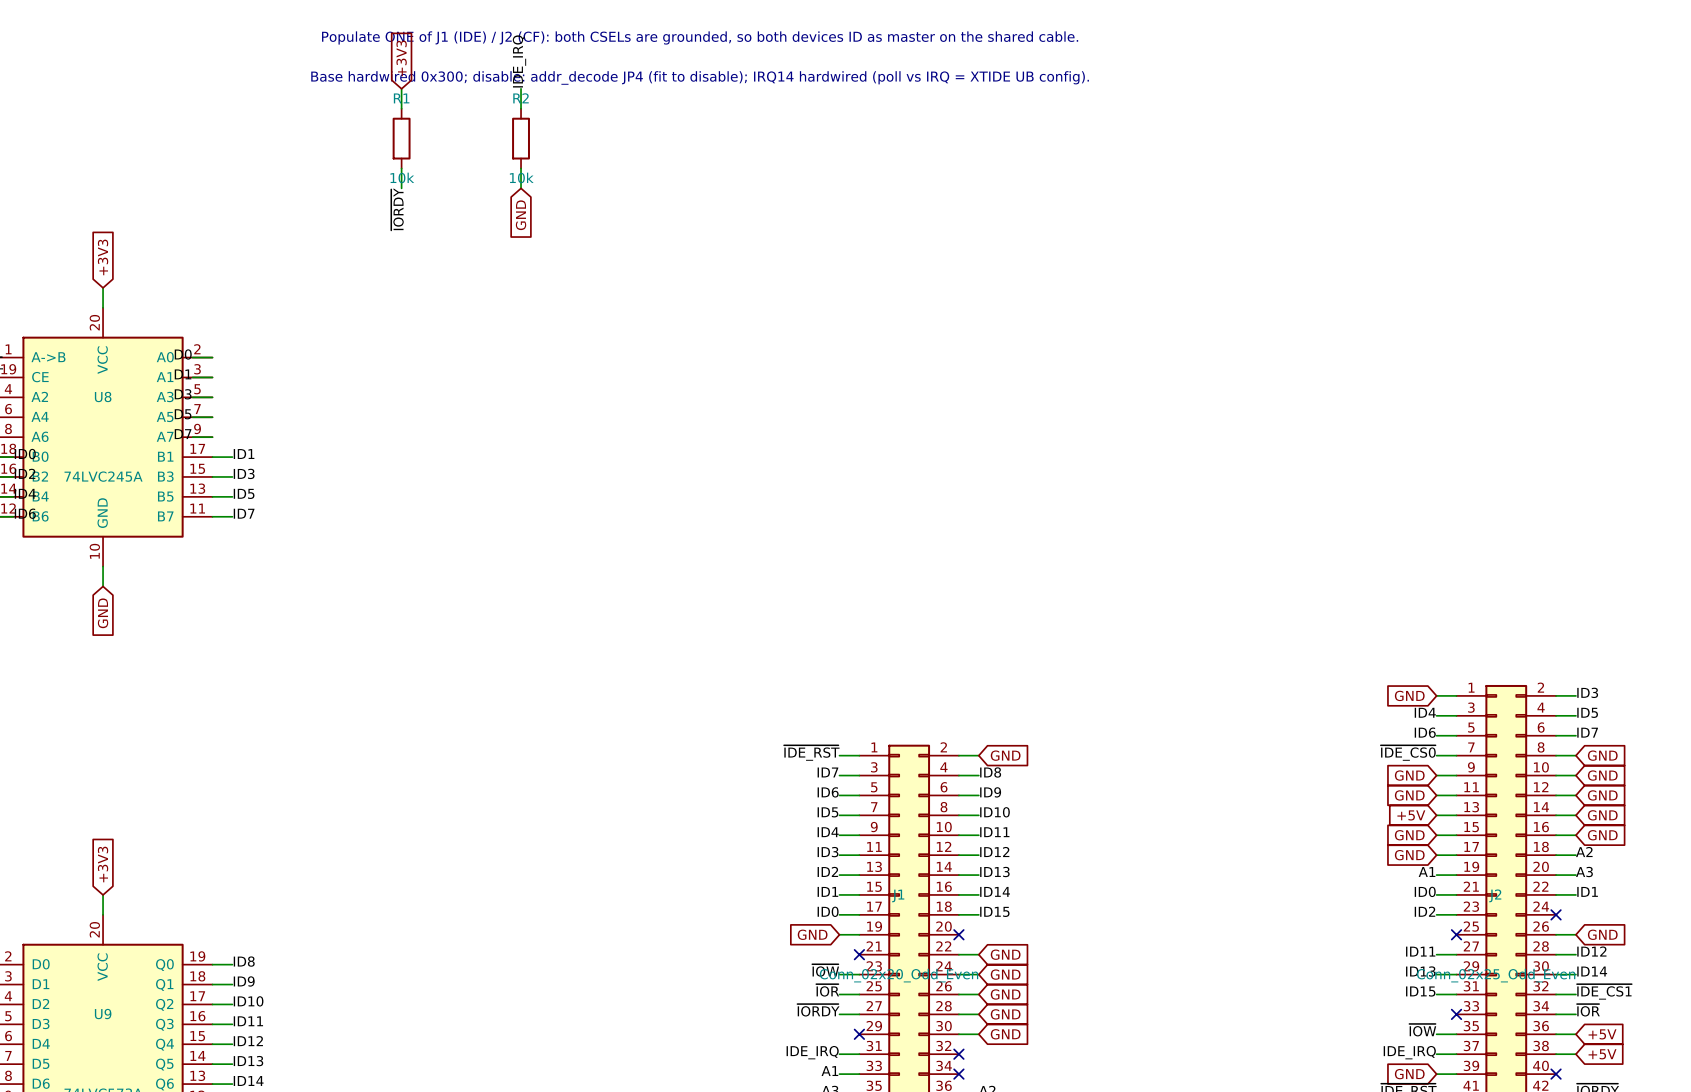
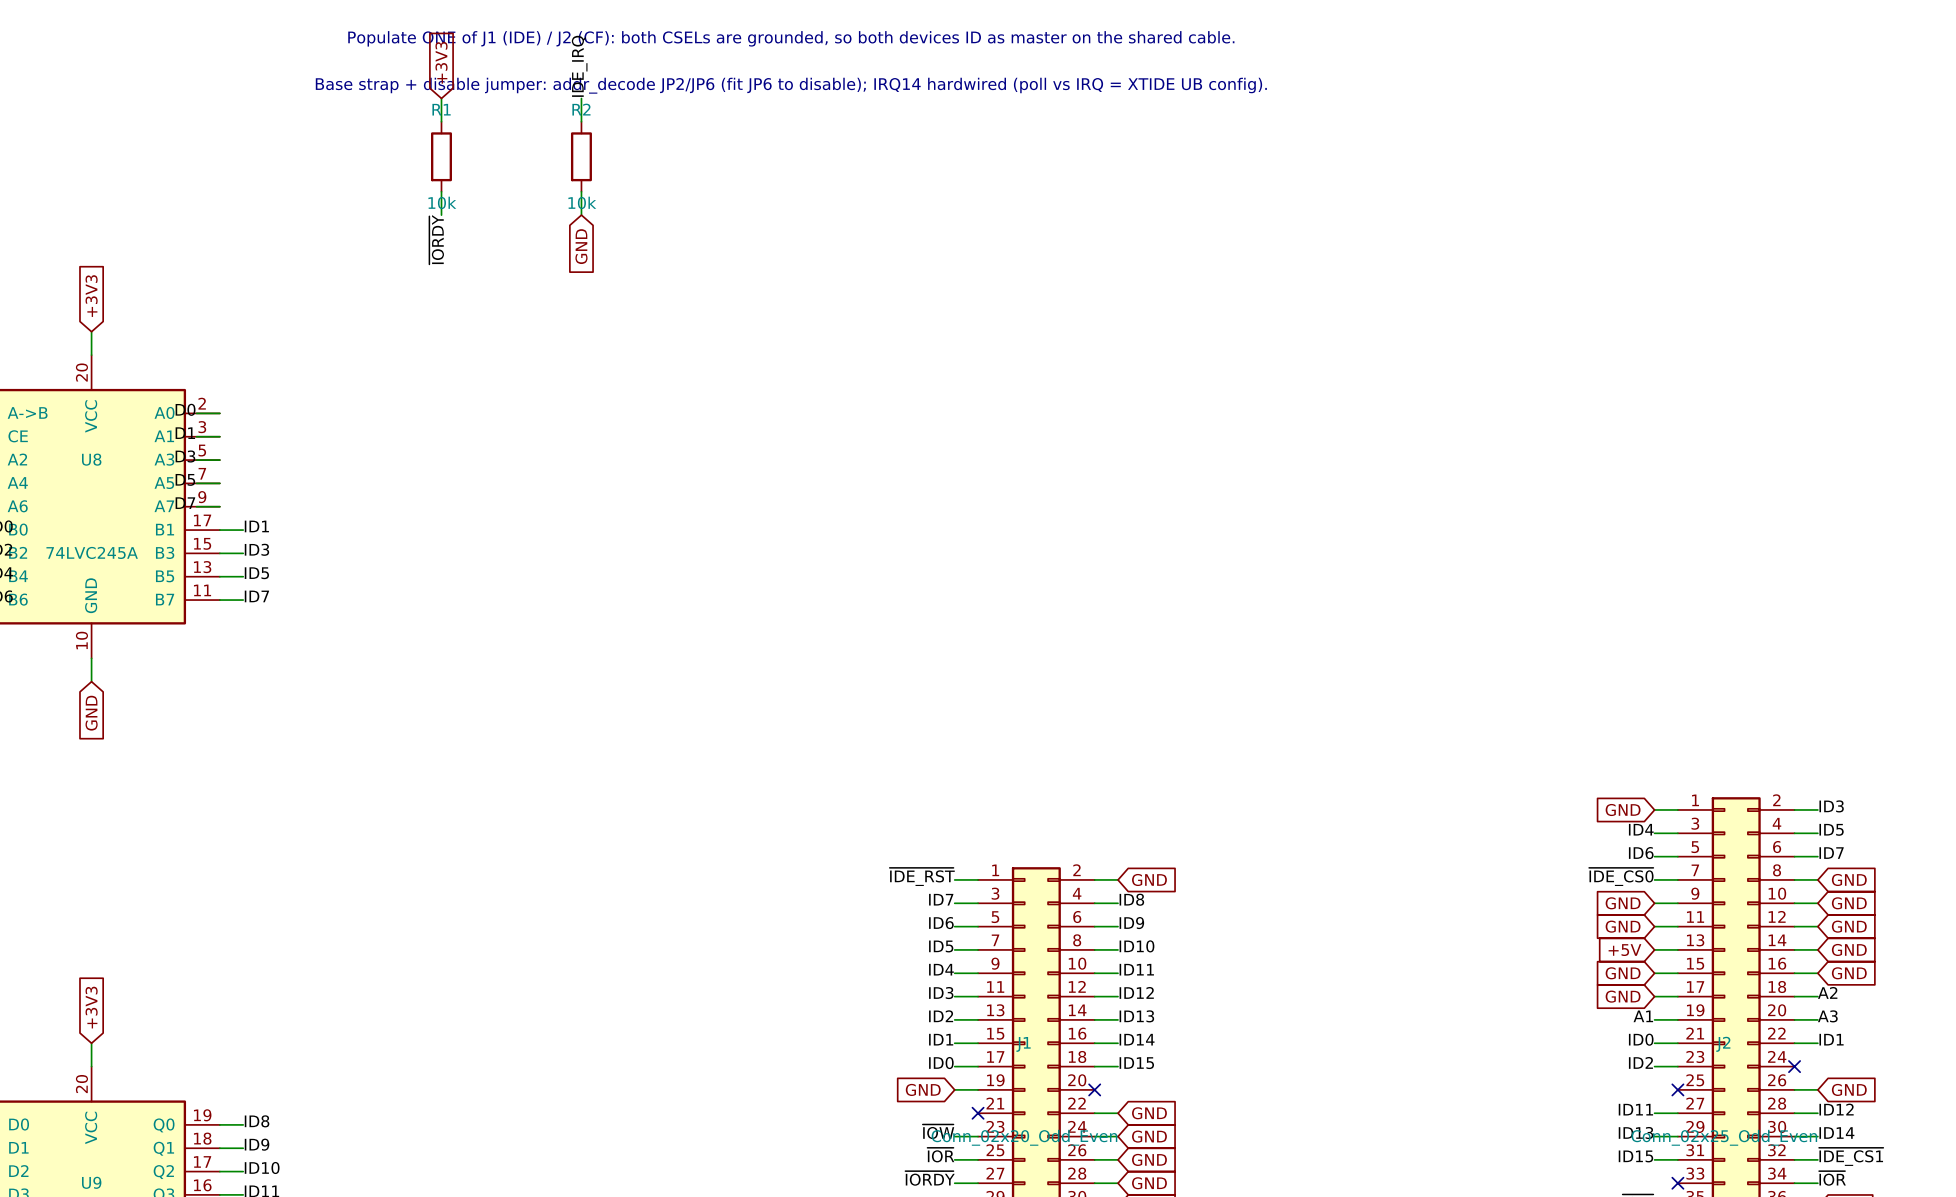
text: Base hardwired 0x300; disable: addr_decode JP4 (fit to disable); IRQ14 hardwired (poll vs IRQ = XTIDE UB config). (700, 77) -> Base strap + disable jumper: addr_decode JP2/JP6 (fit JP6 to disable); IRQ14 hardwired (poll vs IRQ = XTIDE UB config). (791, 85)

